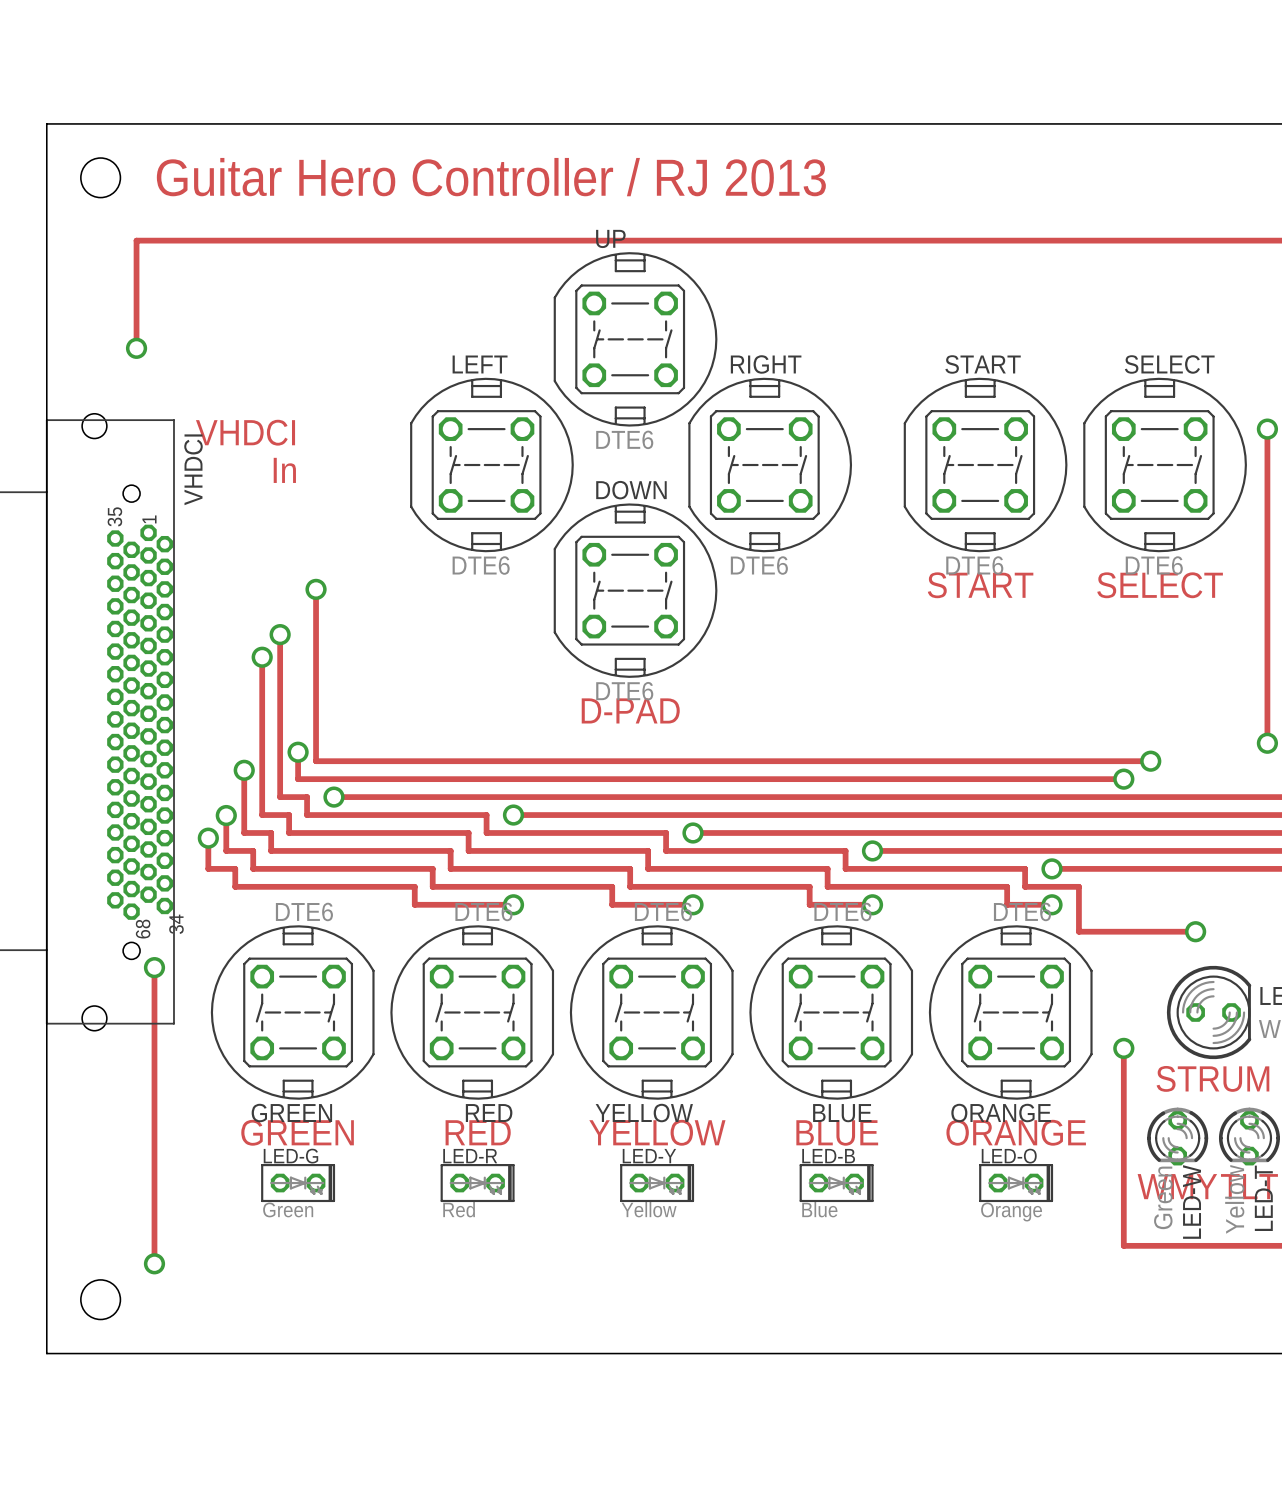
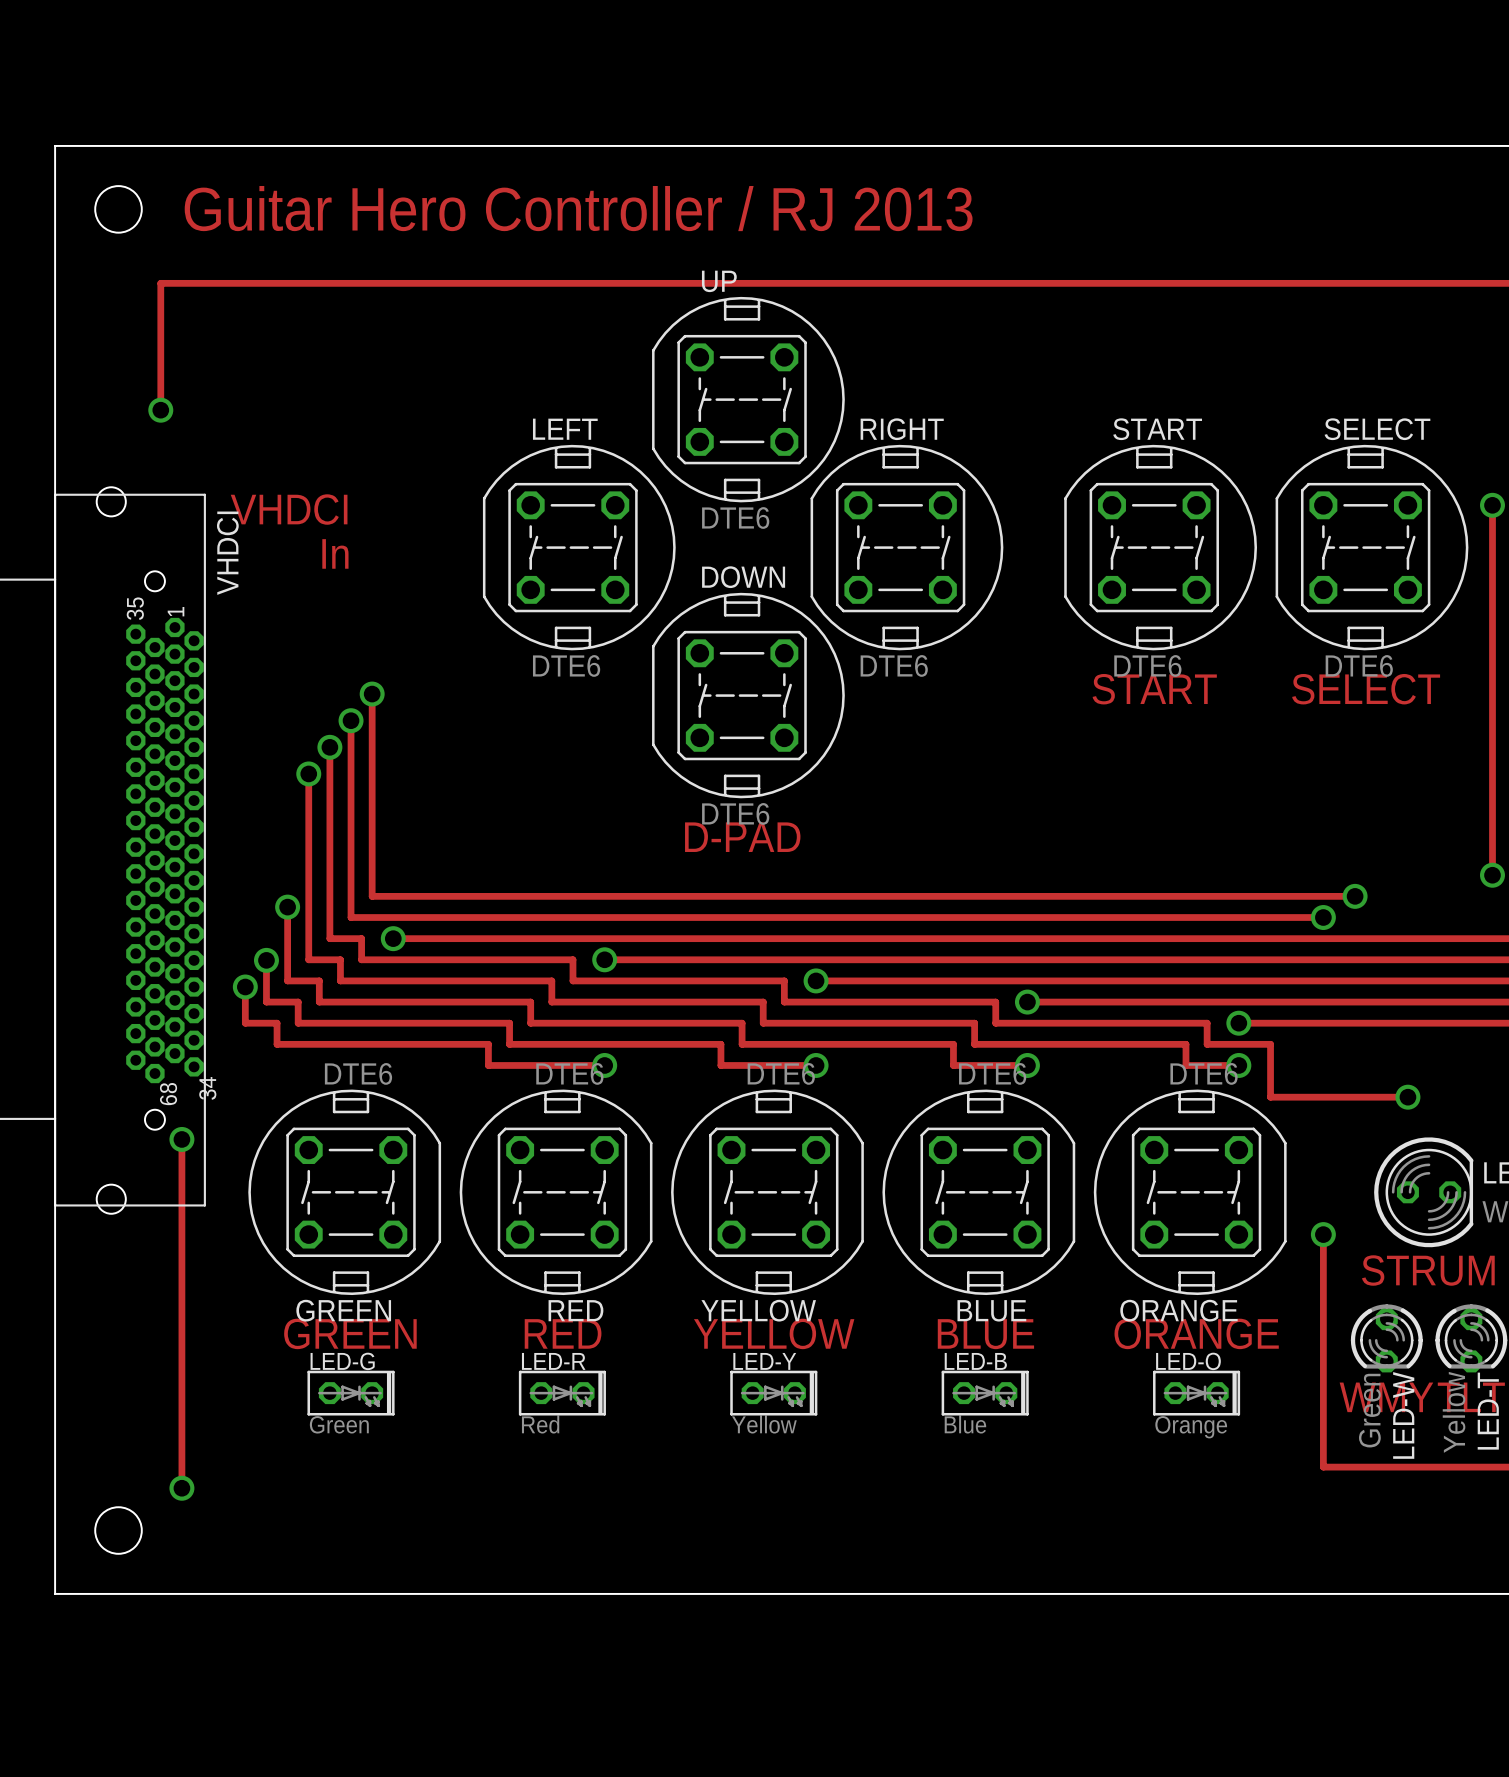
track: none -> (351, 720) (351, 885)
via: none -> (351, 720)
via: (298, 752) -> none

